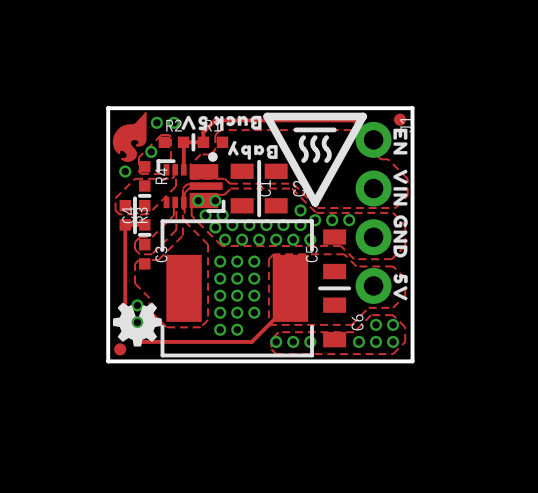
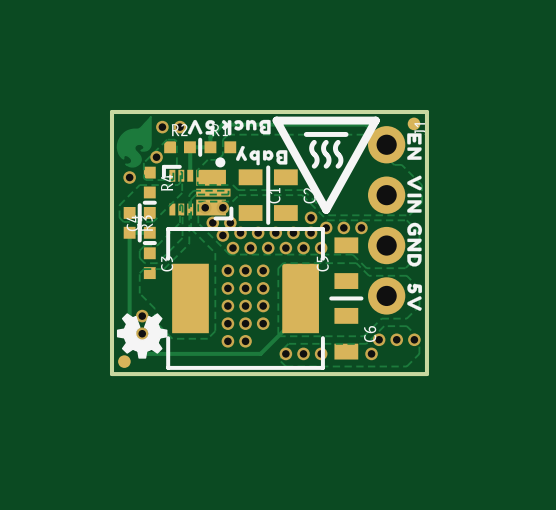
via: (376, 324) -> none
via: (393, 324) -> none
via: none -> (379, 339)
via: none -> (396, 339)
via: none -> (414, 339)
via: (376, 341) -> none
via: (393, 341) -> none

